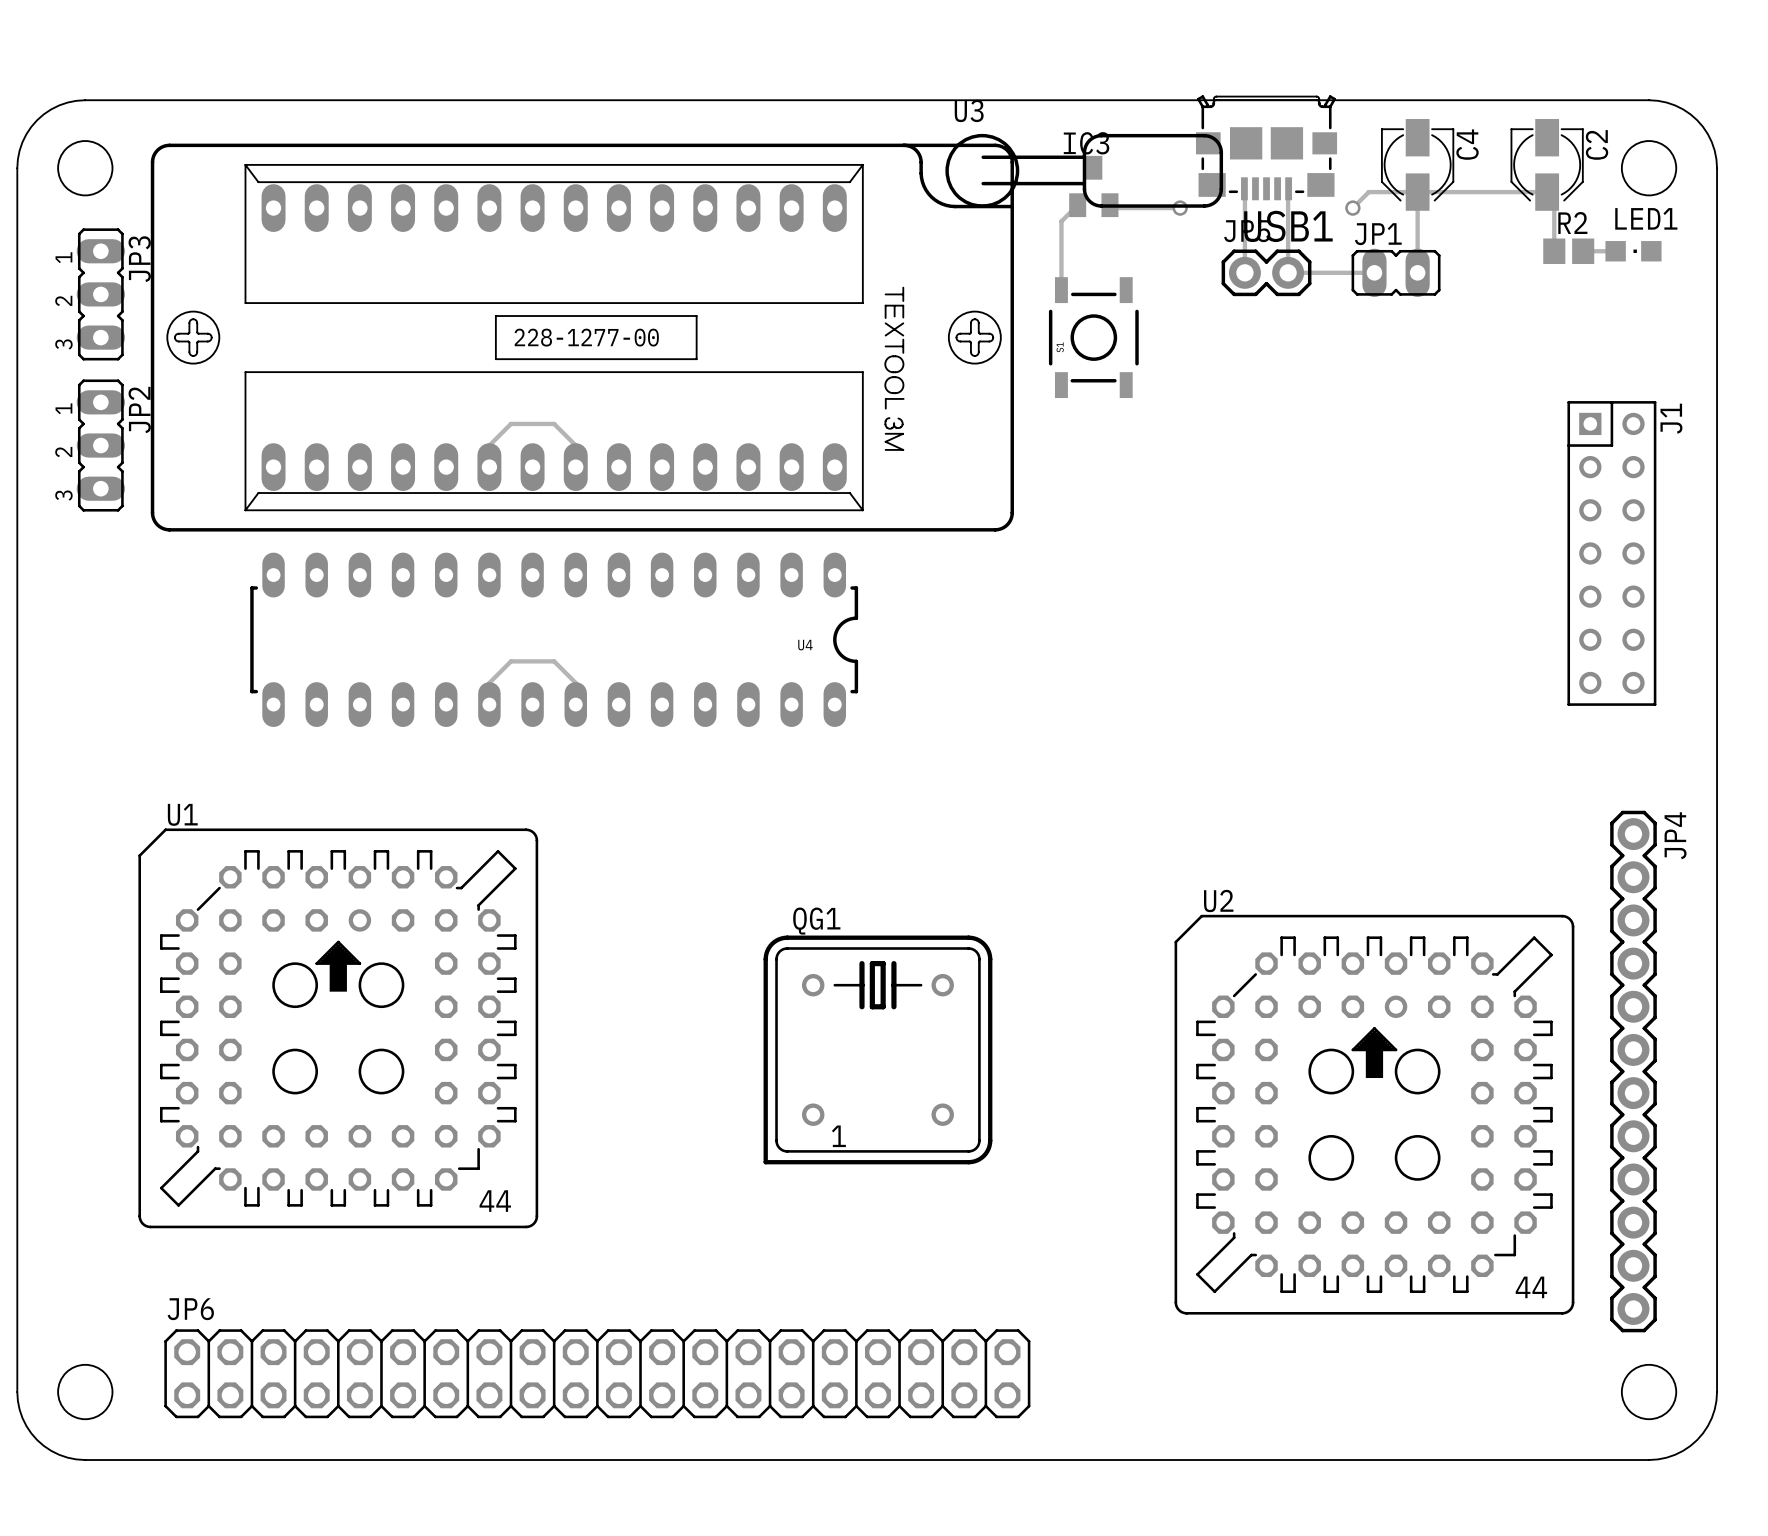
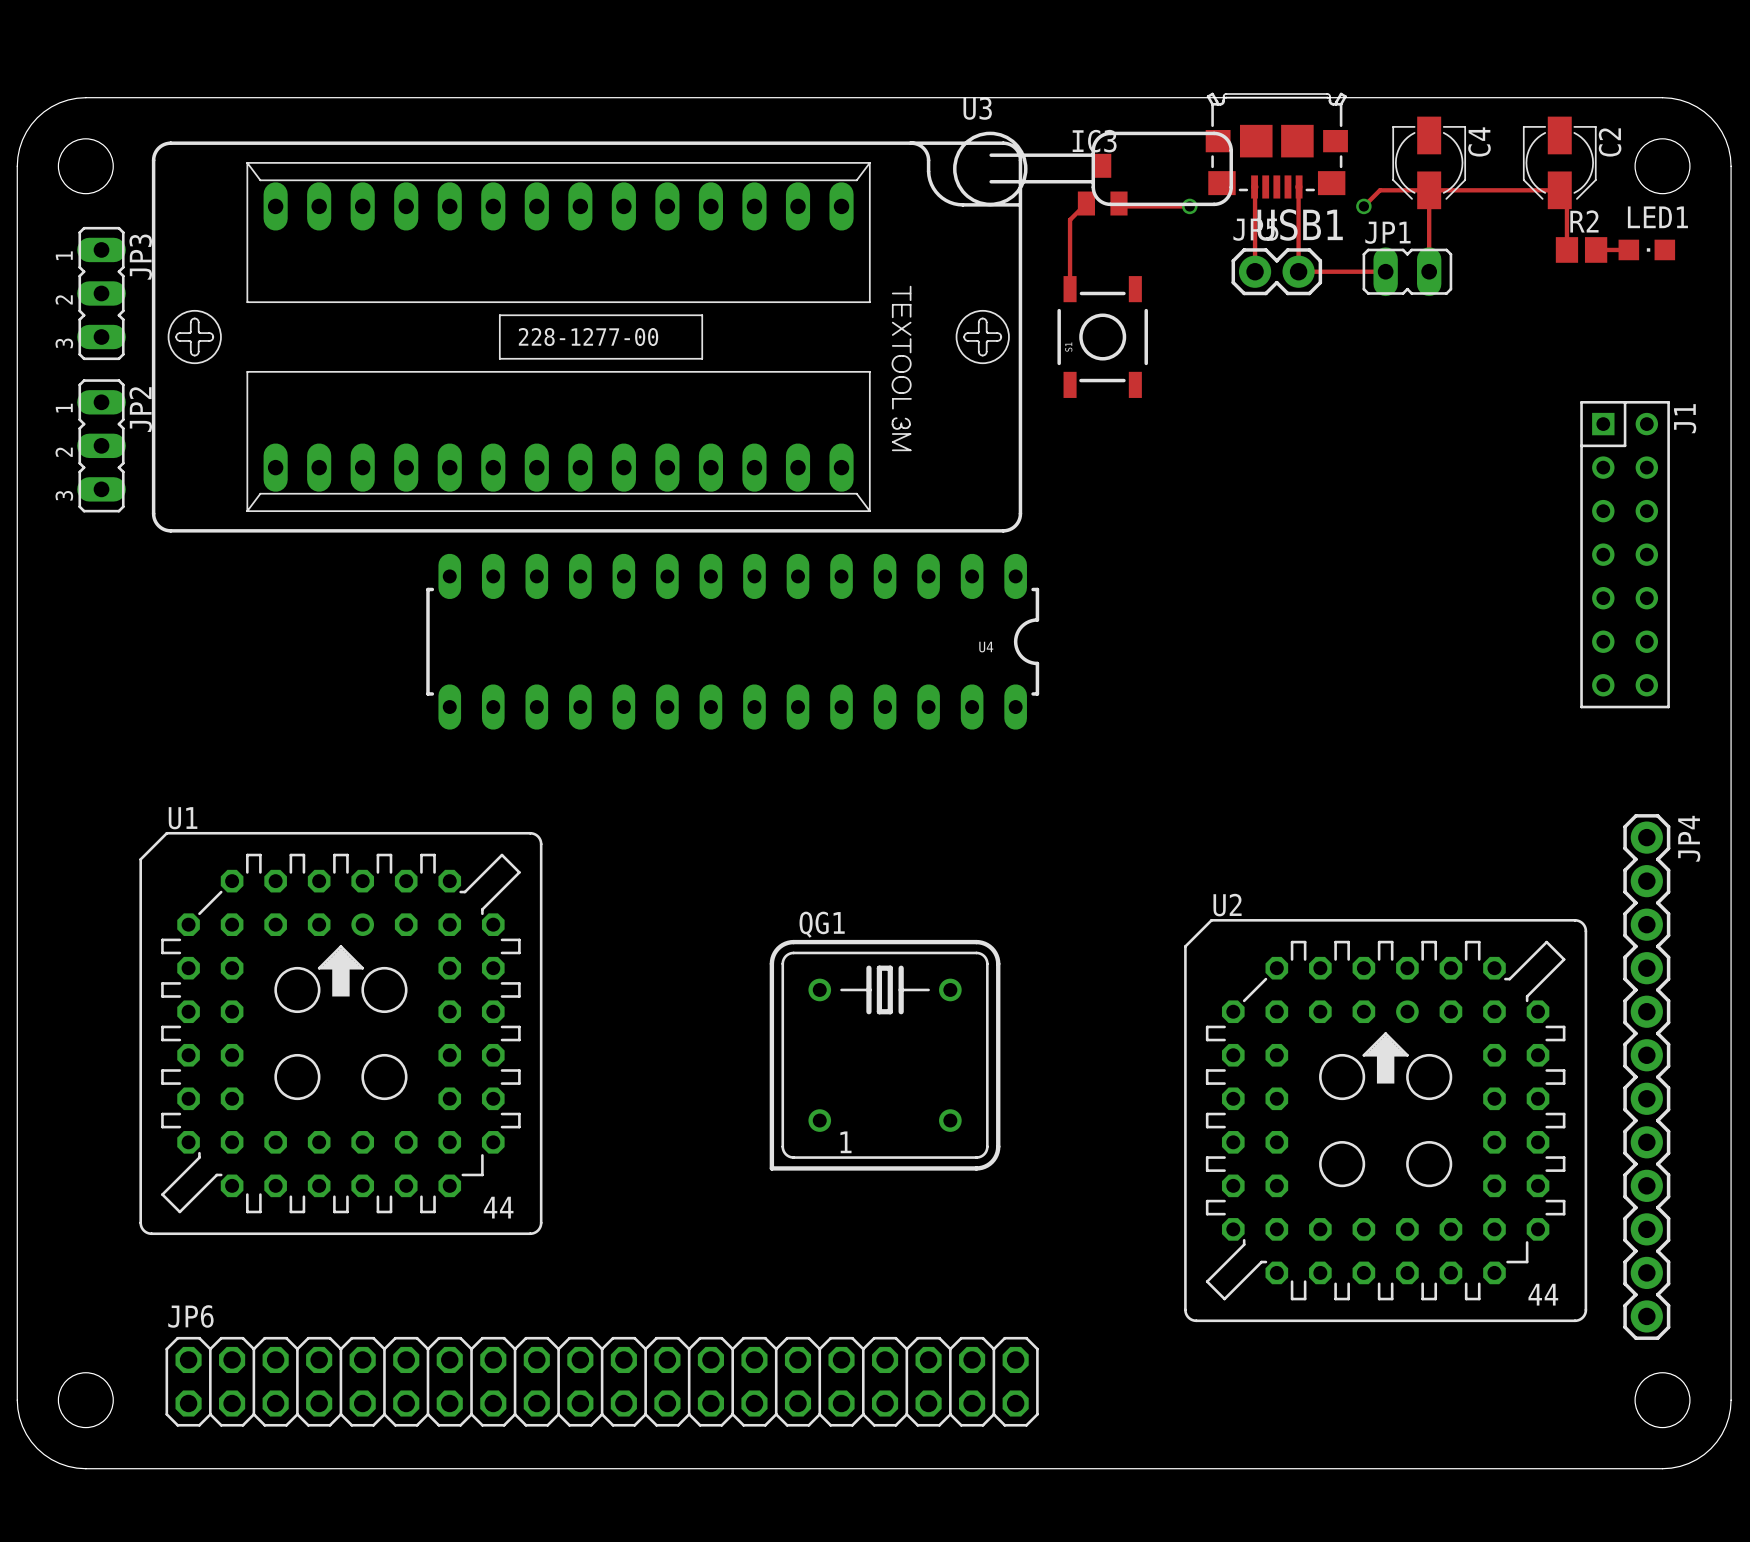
track: (489, 467) (489, 445) (510, 423) (554, 423) (575, 445) (575, 467) -> none
U4 position: (554, 639) -> (732, 641)
track: (489, 704) (489, 682) (510, 661) (554, 661) (575, 682) (575, 704) -> none

